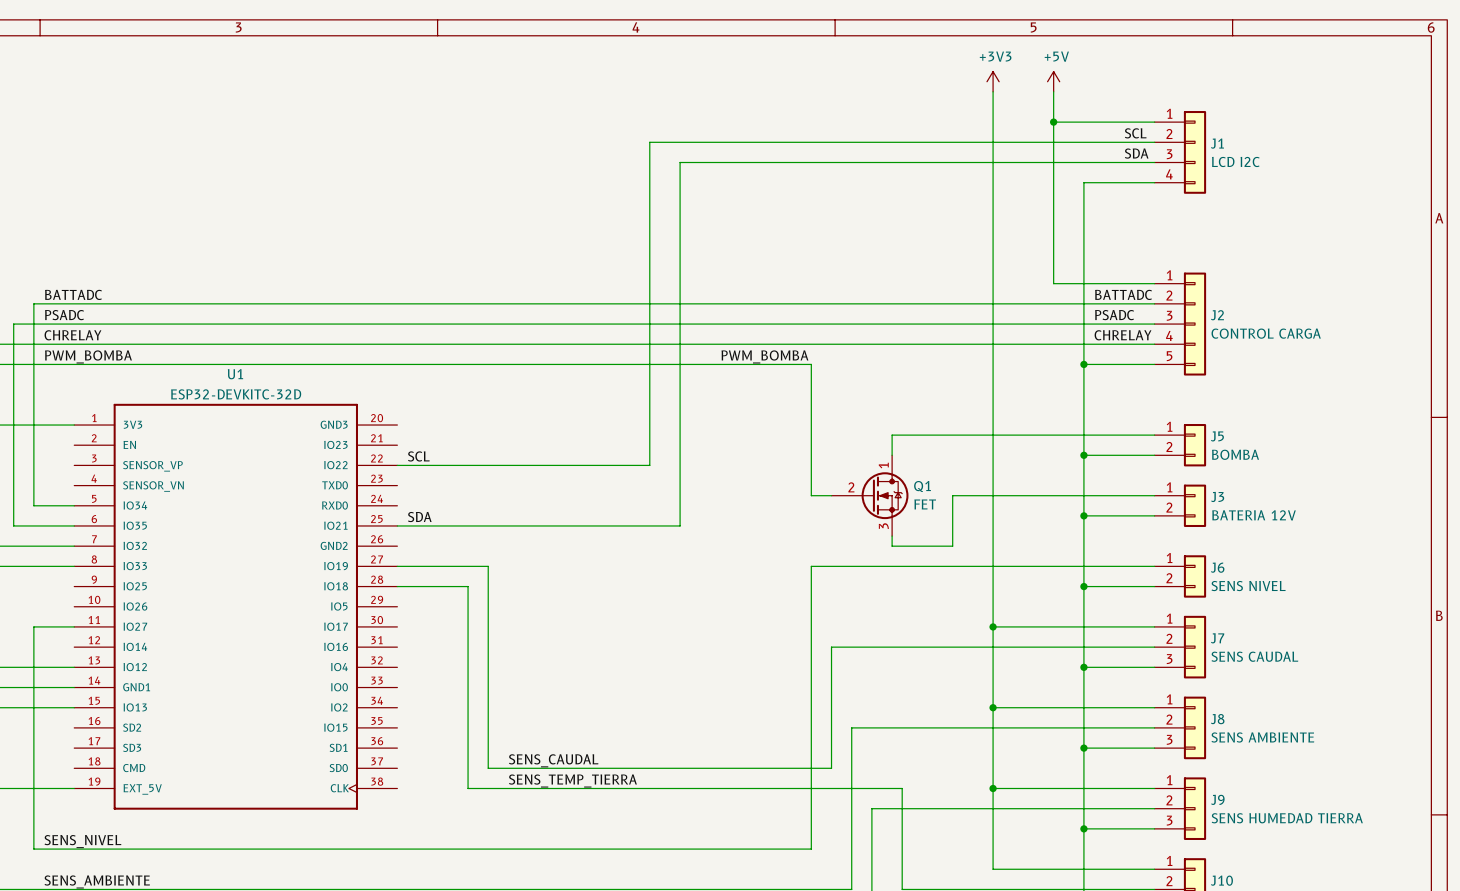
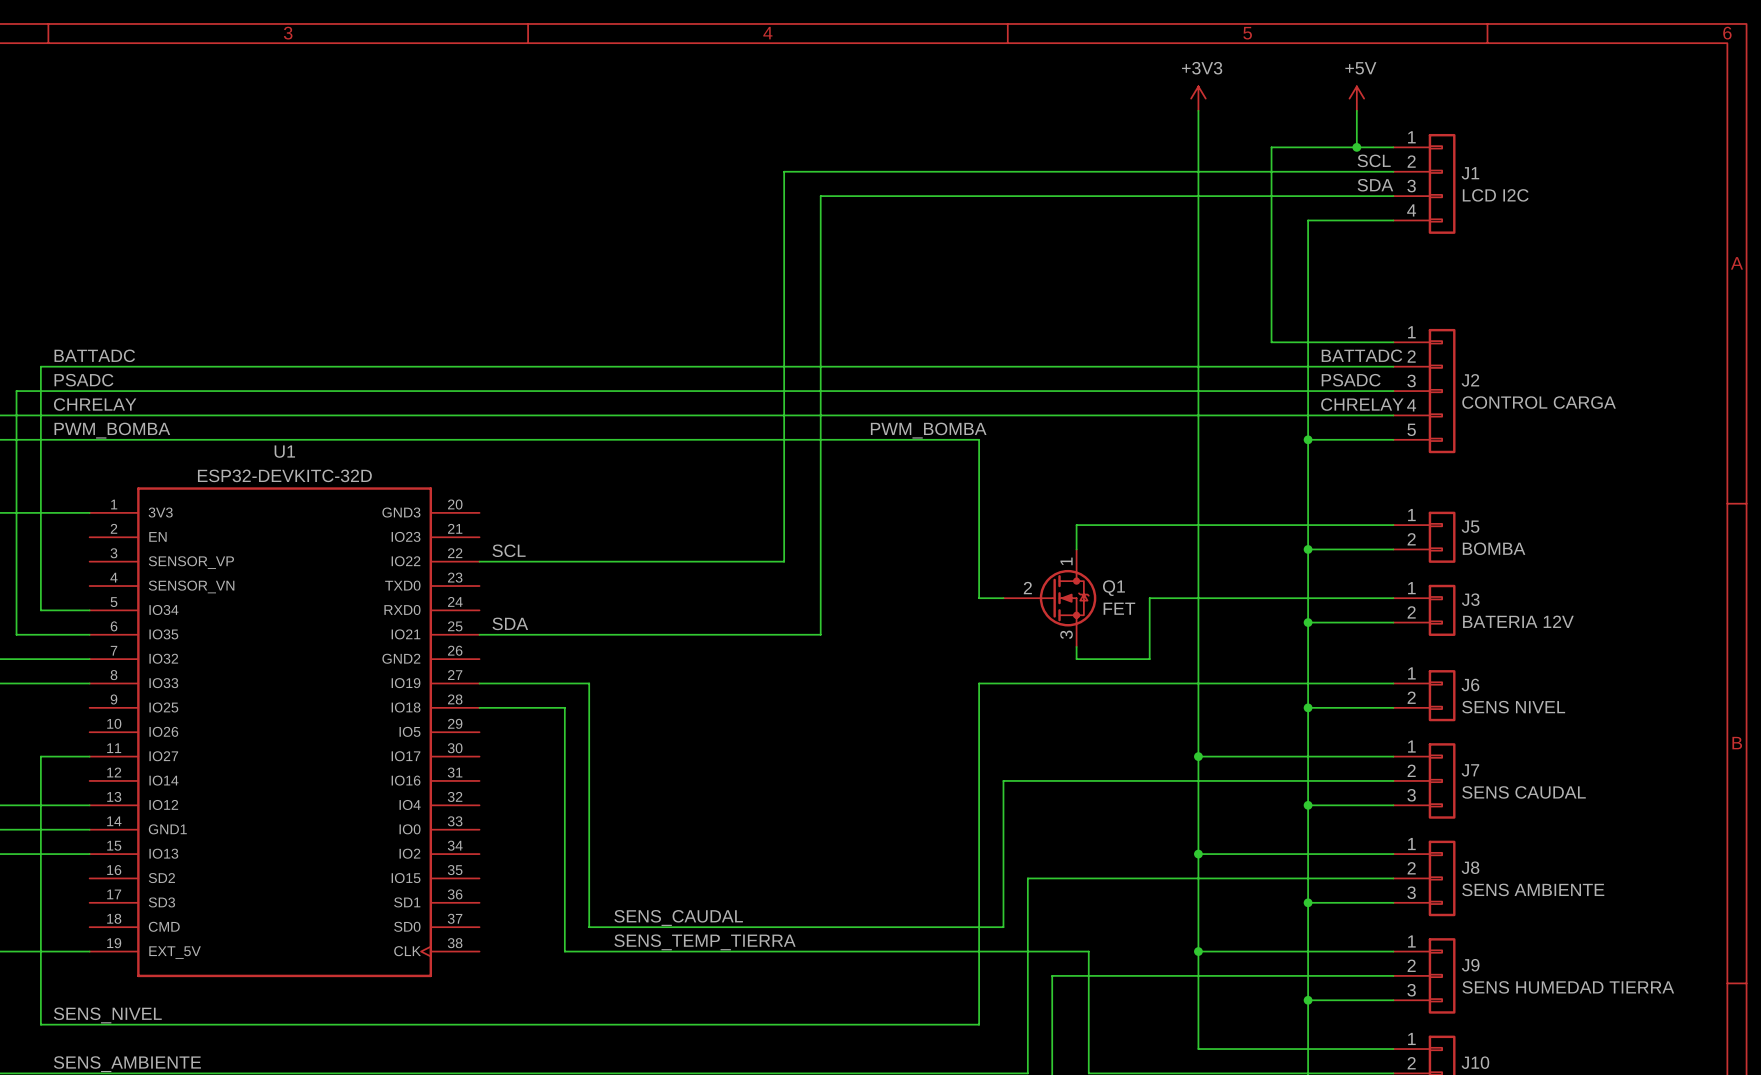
power symbol position: +5V (1053, 81) -> +5V (1356, 98)
wire: (1053, 91) (1053, 122) -> (1356, 110) (1356, 147)
junction: (1053, 122) -> none
junction: none -> (1356, 147)

